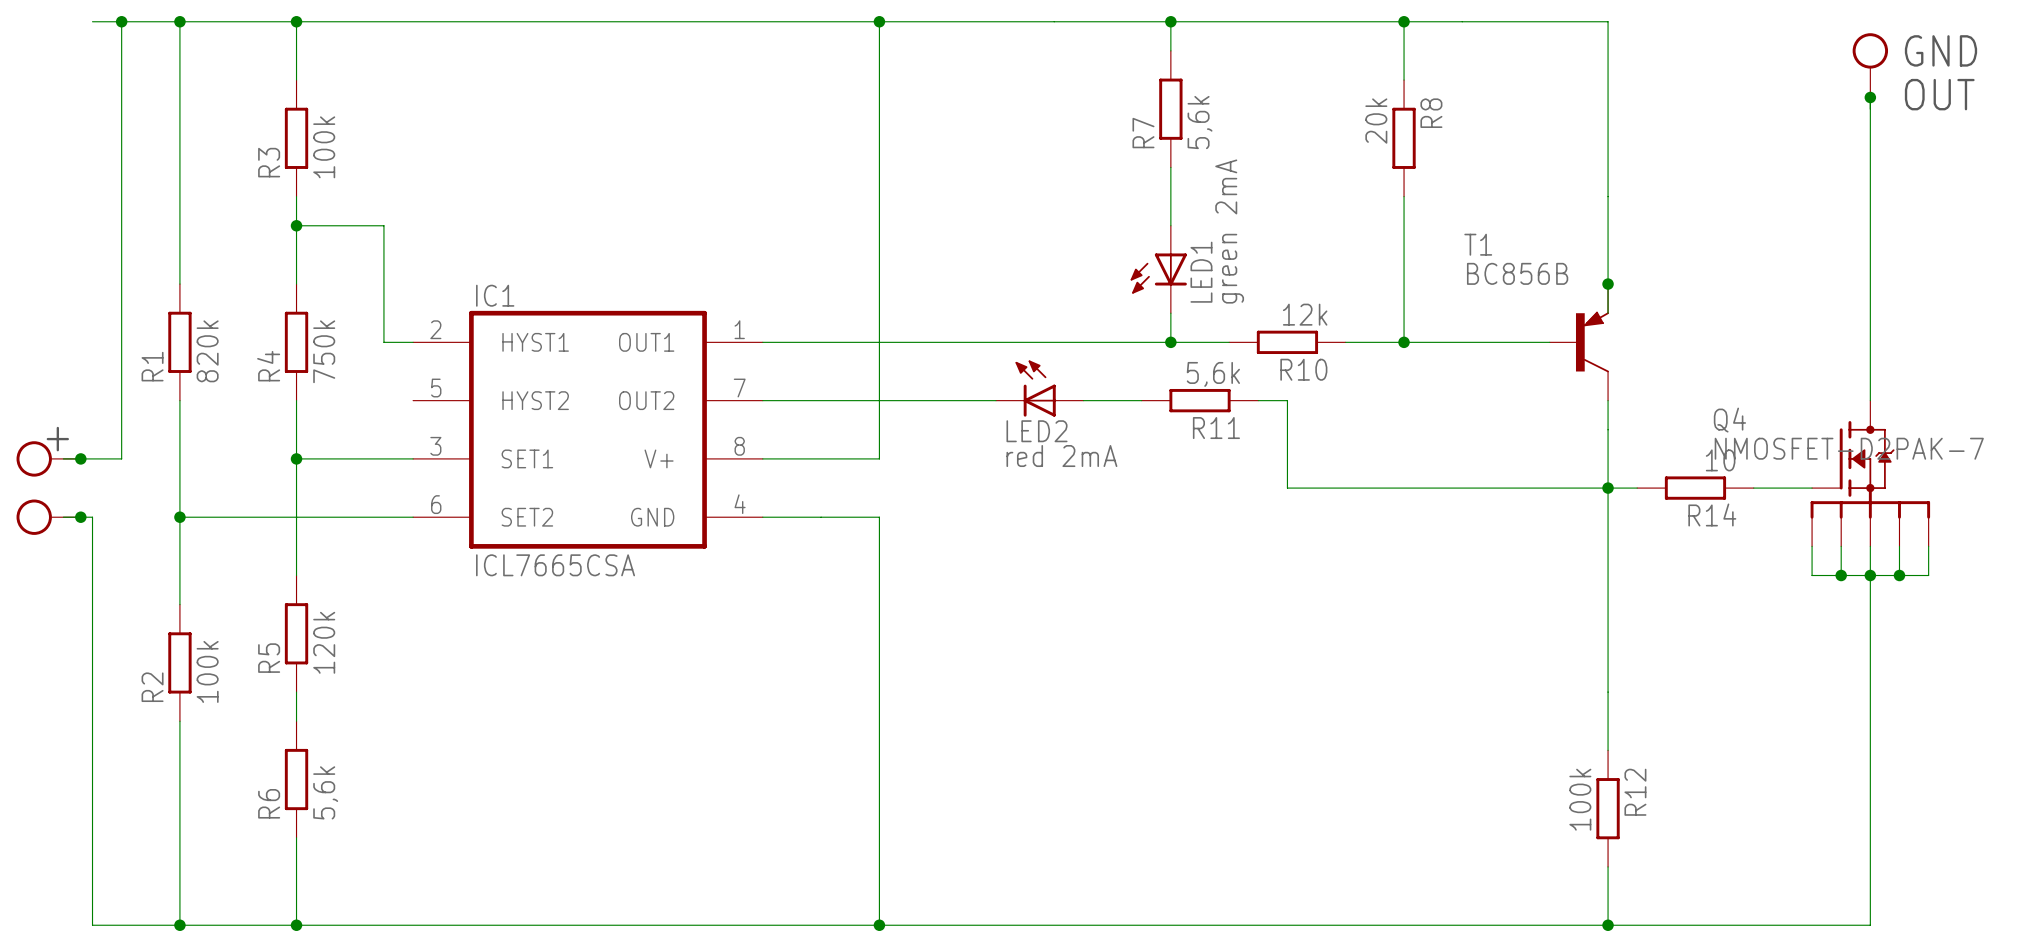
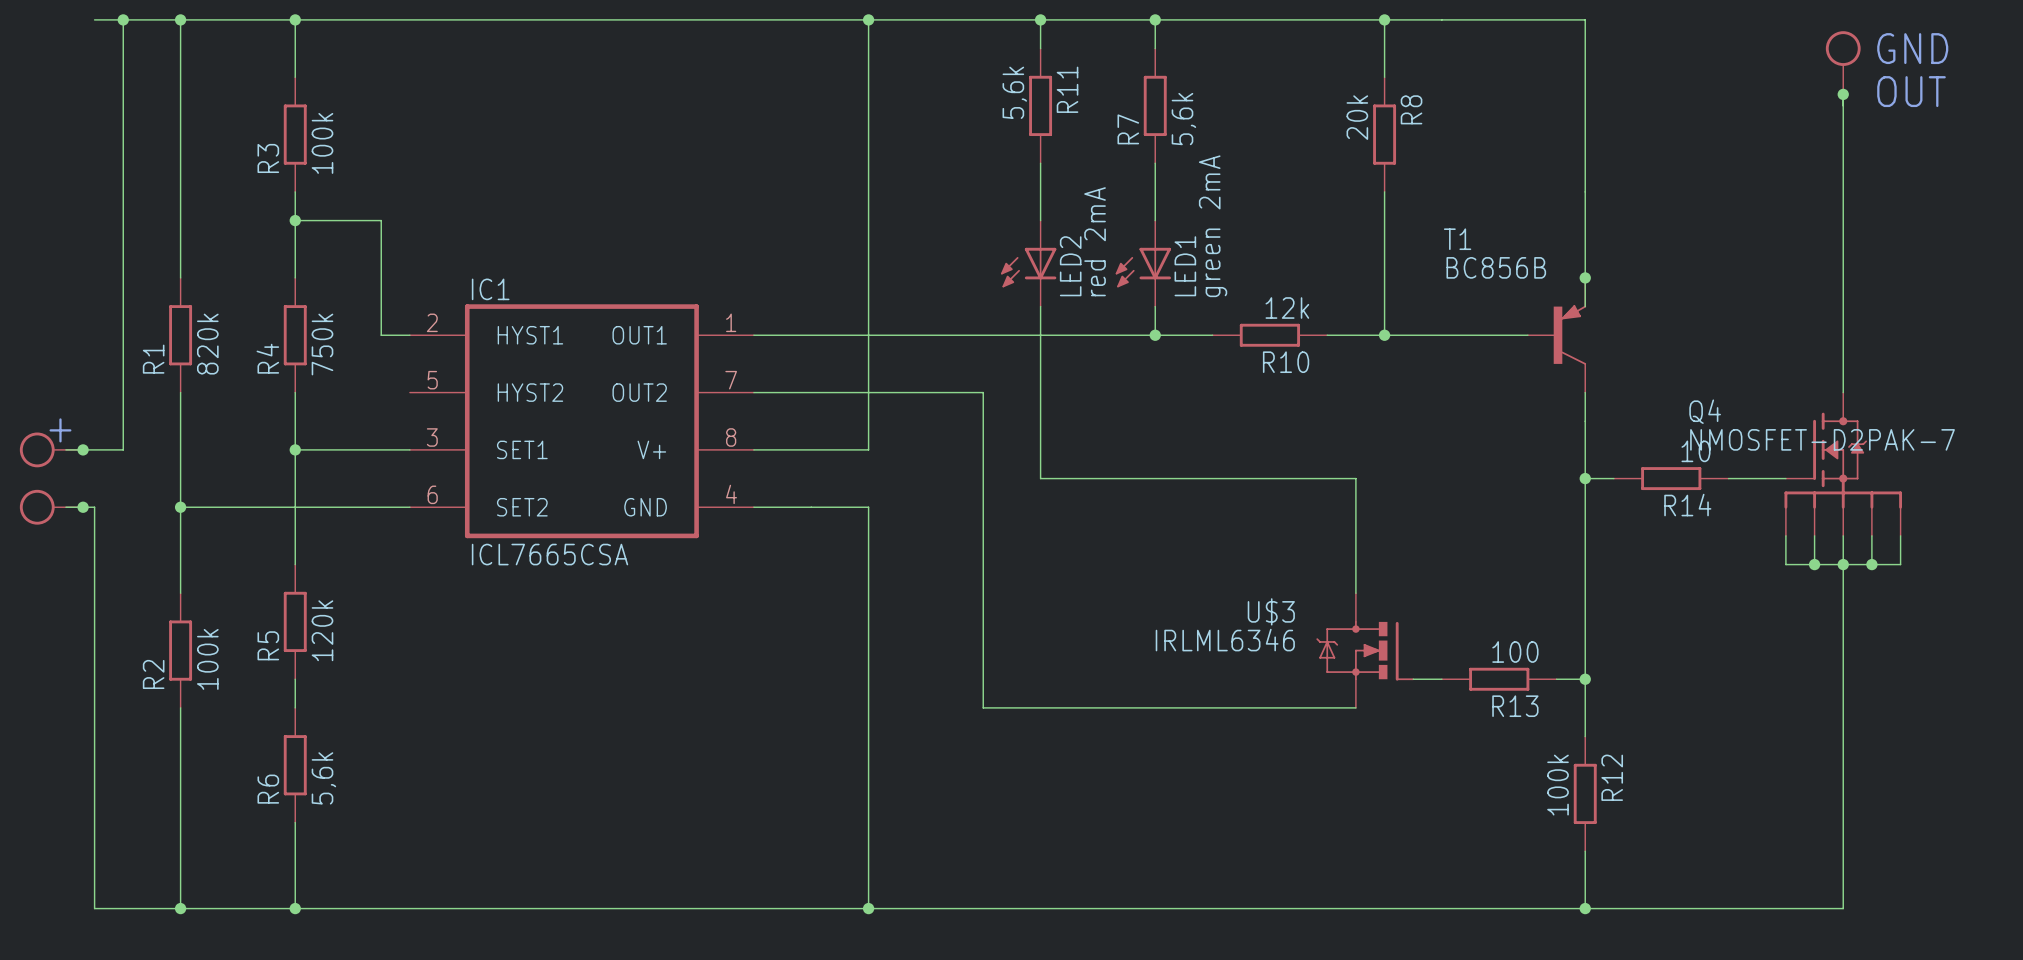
wire: none -> (1040, 19) (1040, 48)
junction: none -> (1040, 19)
wire: none -> (1040, 163) (1040, 220)
R11 value position: 5,6k (1213, 374) -> 5,6k (1014, 92)
LED2 rotation: 0° (1035, 388) -> 90° counterclockwise (1028, 267)
LED2 position: (1039, 388) -> (1028, 263)
wire: none -> (983, 392) (983, 707) (1355, 707)
wire: (1083, 400) (1141, 400) -> none
R11 rotation: 0° (1200, 400) -> 90° clockwise (1040, 105)
R11 position: (1200, 400) -> (1040, 105)
wire: (1258, 400) (1287, 400) (1287, 488) -> (1040, 306) (1040, 478) (1269, 478)
R11 name position: R11 (1216, 428) -> R11 (1067, 89)
wire: (1374, 488) (1608, 488) -> (1355, 478) (1355, 593)
U$3: none -> IRLML6346 (1365, 650)
wire: none -> (1413, 679) (1441, 679)
R13: none -> 100 (1499, 679)
wire: none -> (1556, 679) (1585, 679)
junction: none -> (1585, 679)

